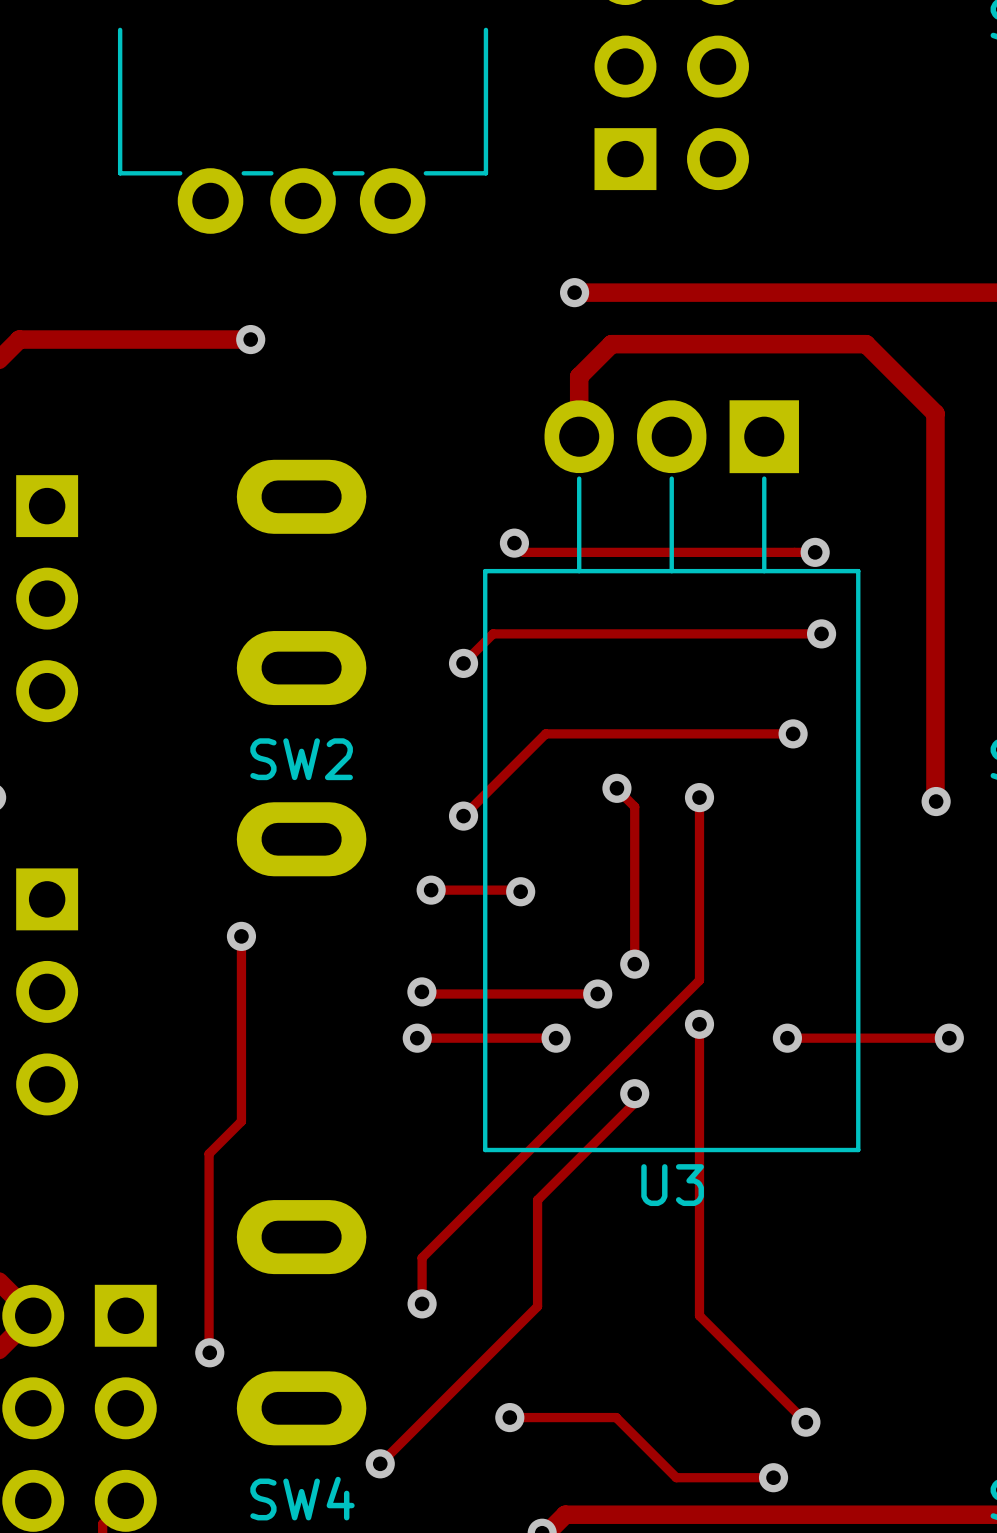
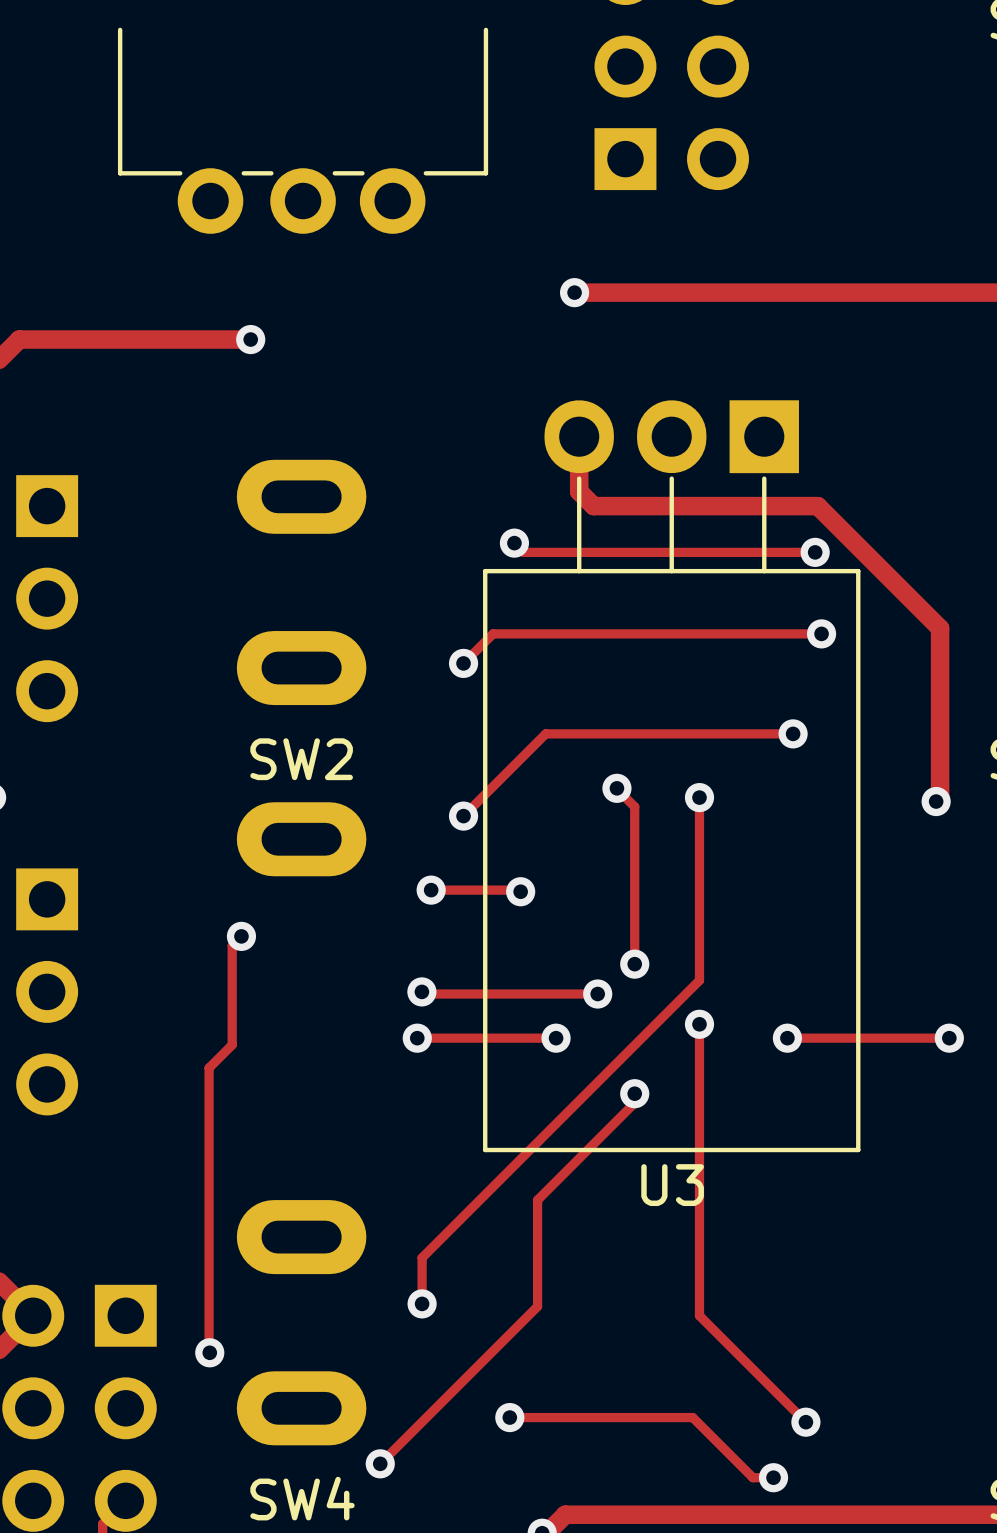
track: (579, 436) (579, 376) (611, 344) (866, 344) (935, 413) (936, 801) -> (579, 436) (579, 491) (593, 506) (817, 506) (940, 628) (940, 797) (936, 801)
track: (241, 936) (241, 1121) (209, 1153) -> (241, 936) (232, 945) (232, 1044) (209, 1068) (209, 1153)
track: (616, 1417) (676, 1477) (752, 1477) -> (616, 1417) (692, 1417) (752, 1477)

